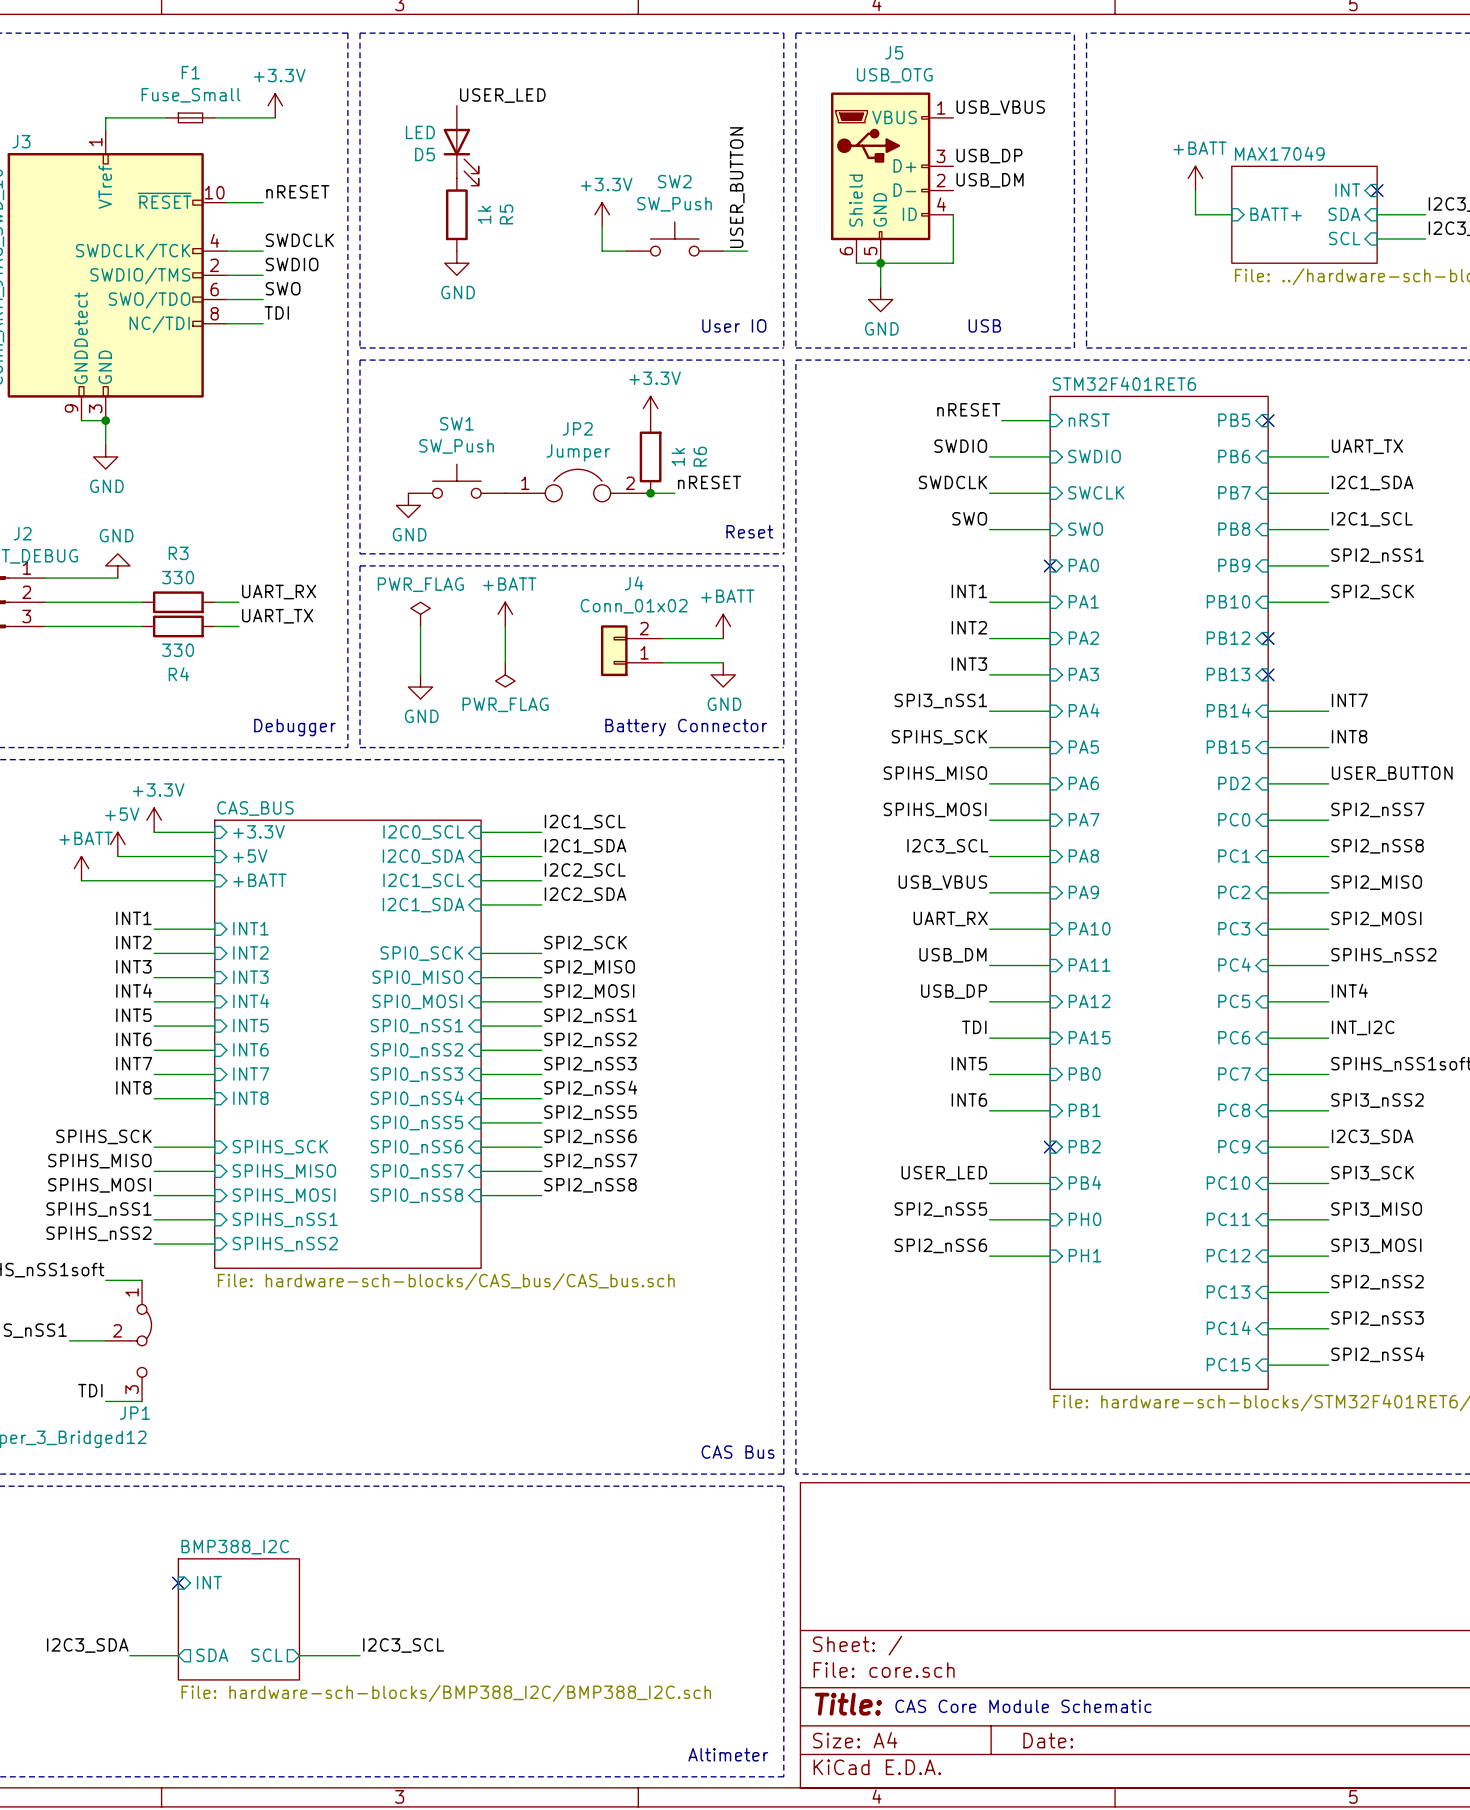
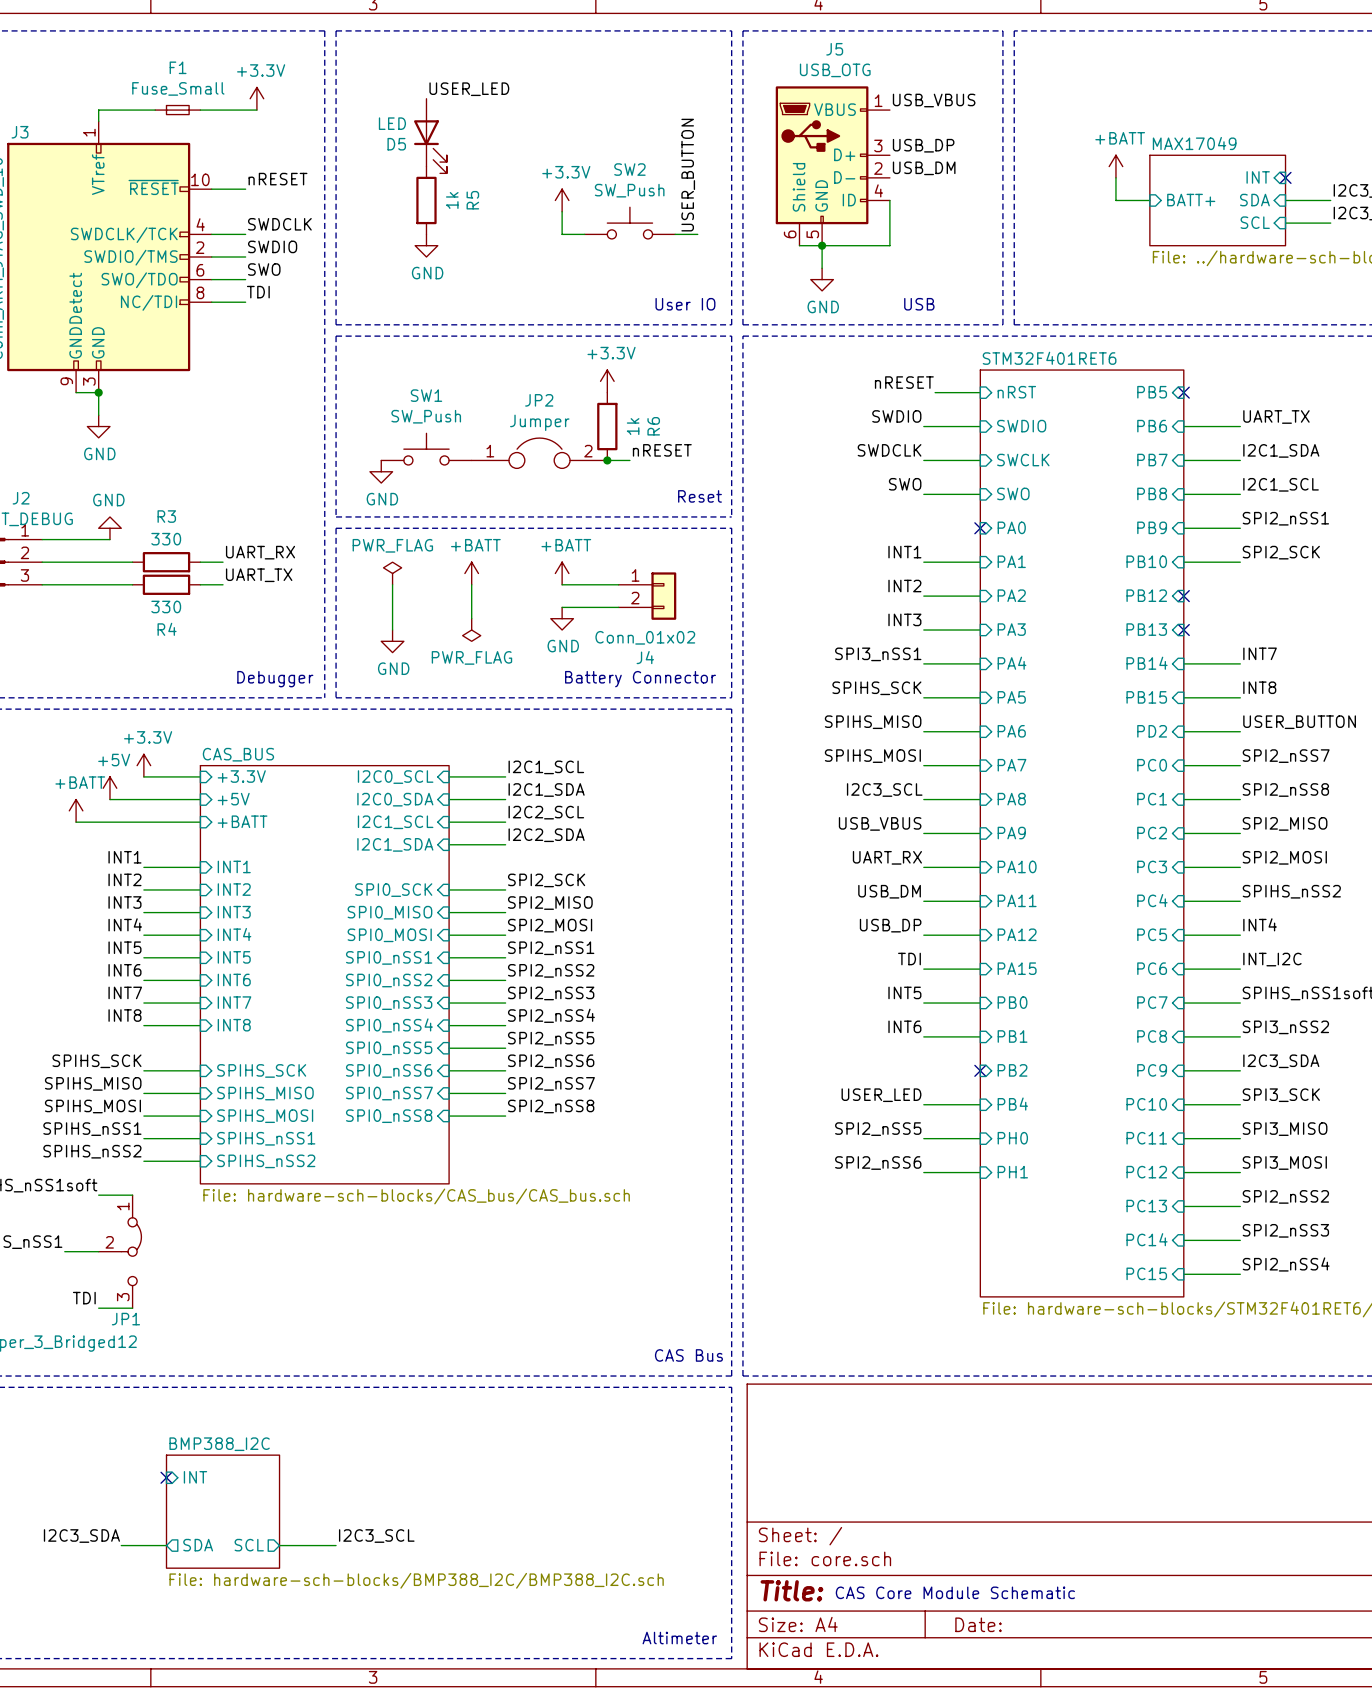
power symbol position: +BATT (723, 626) -> +BATT (562, 573)
wire: (662, 638) (723, 638) -> (562, 584) (618, 584)
J4 rotation: 0° (614, 650) -> 180° (663, 596)
J4 position: (631, 650) -> (647, 596)
wire: (662, 662) (723, 662) -> (562, 607) (618, 607)
power symbol position: GND (723, 674) -> GND (562, 618)

